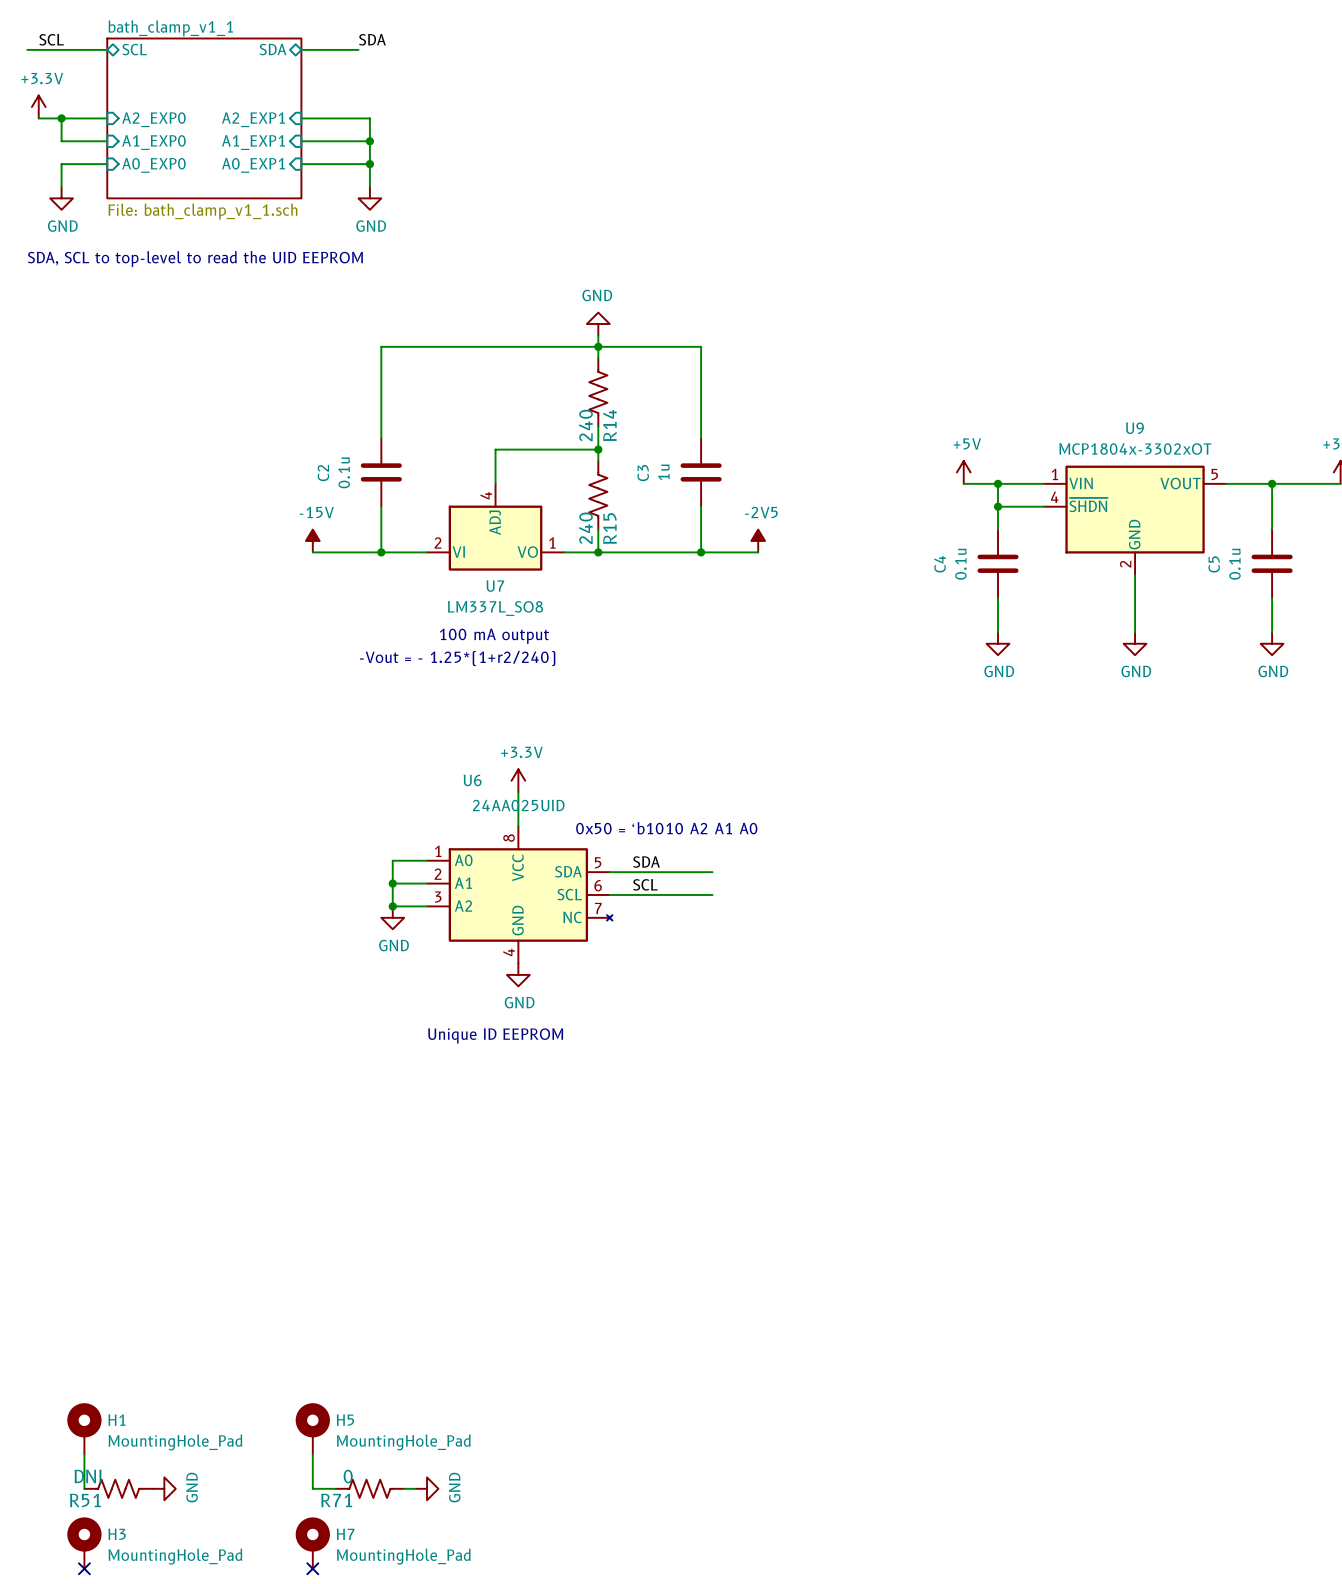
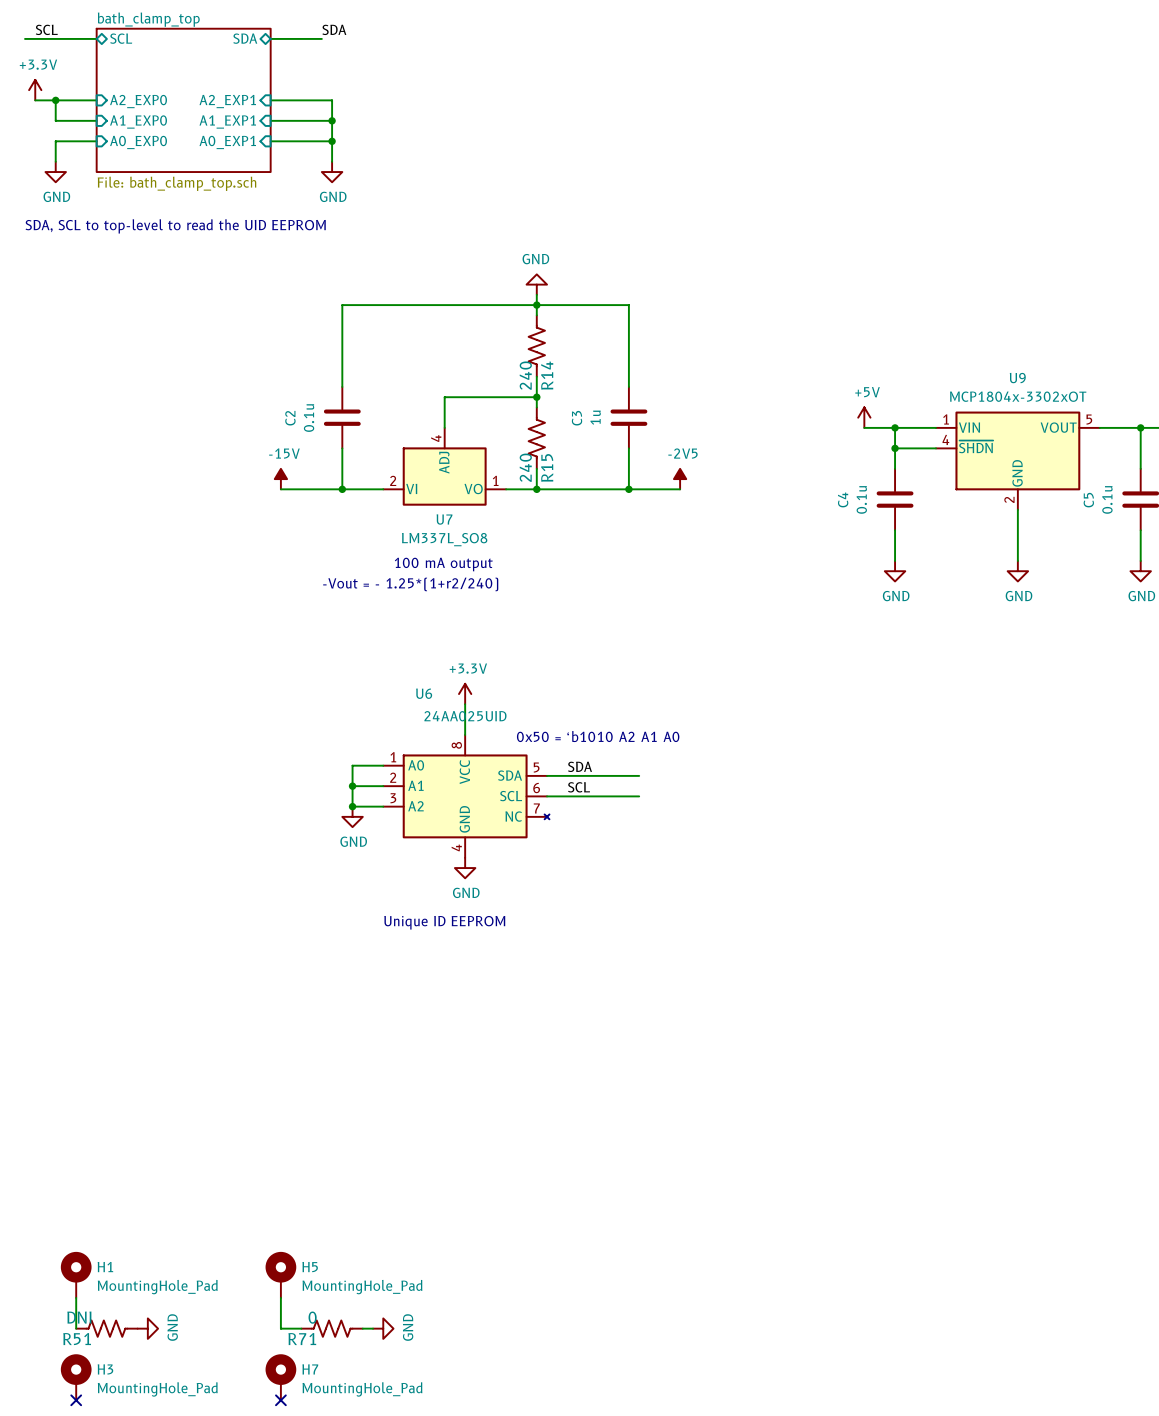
sheet bath_clamp_v1_1 name: bath_clamp_v1_1 (170, 28) -> bath_clamp_top (148, 19)
sheet bath_clamp_v1_1 value: File: bath_clamp_v1_1.sch (202, 211) -> File: bath_clamp_top.sch (177, 183)

